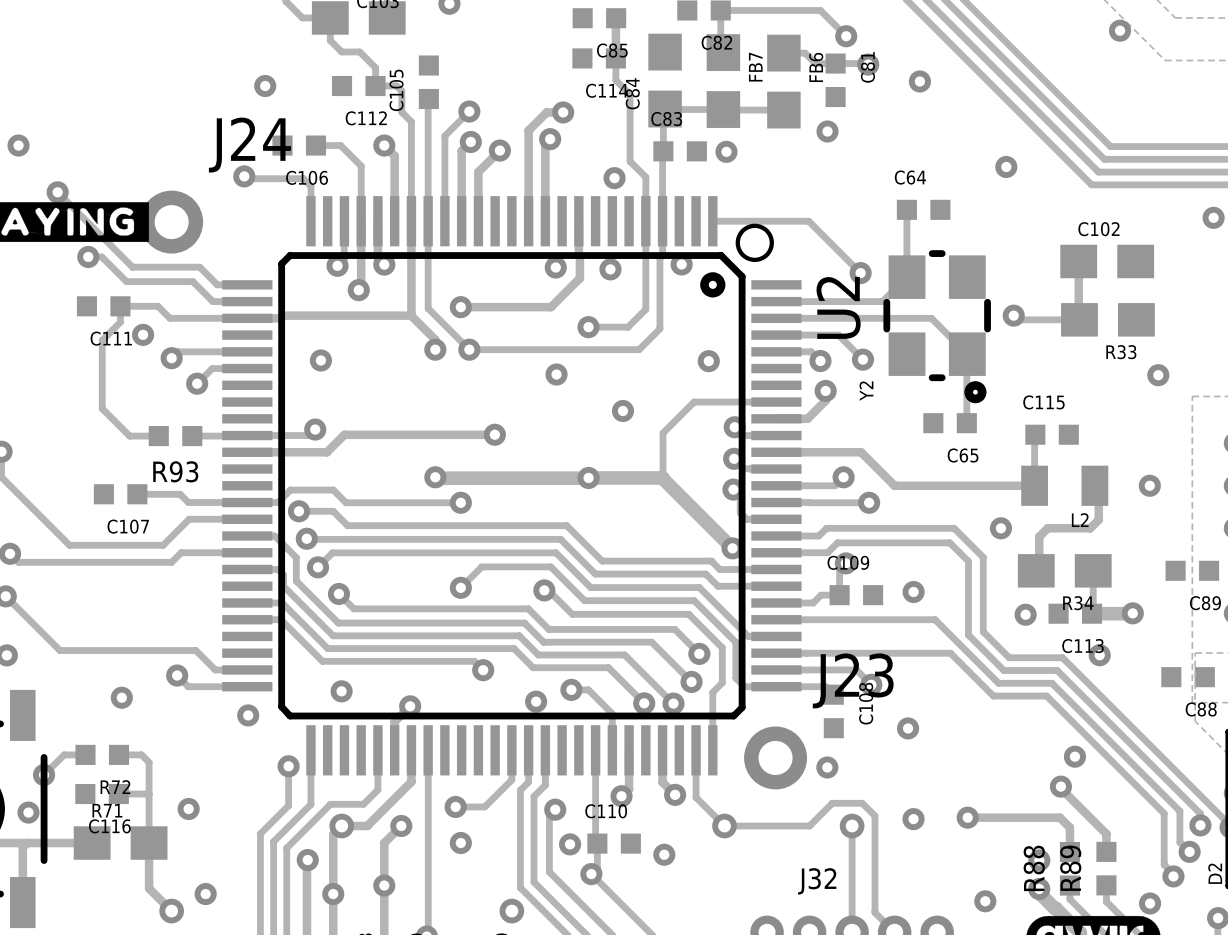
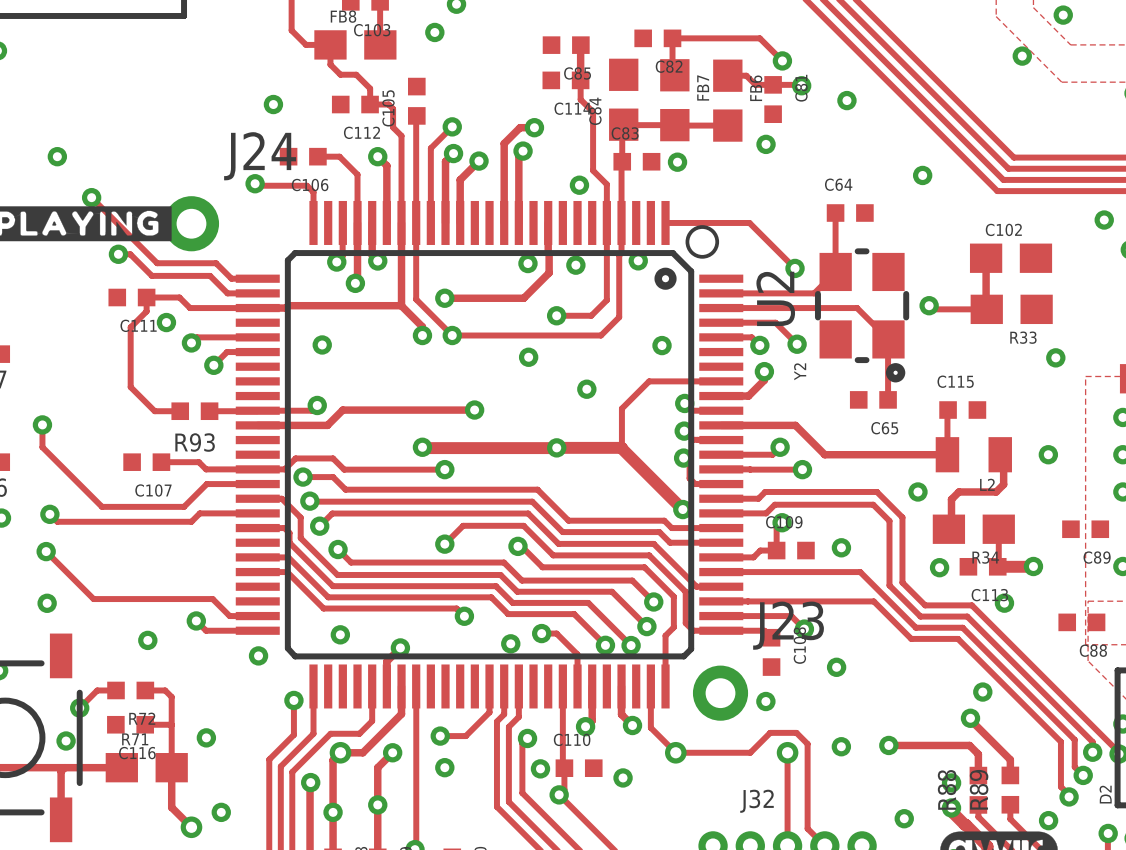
part: (511, 911) -> none

